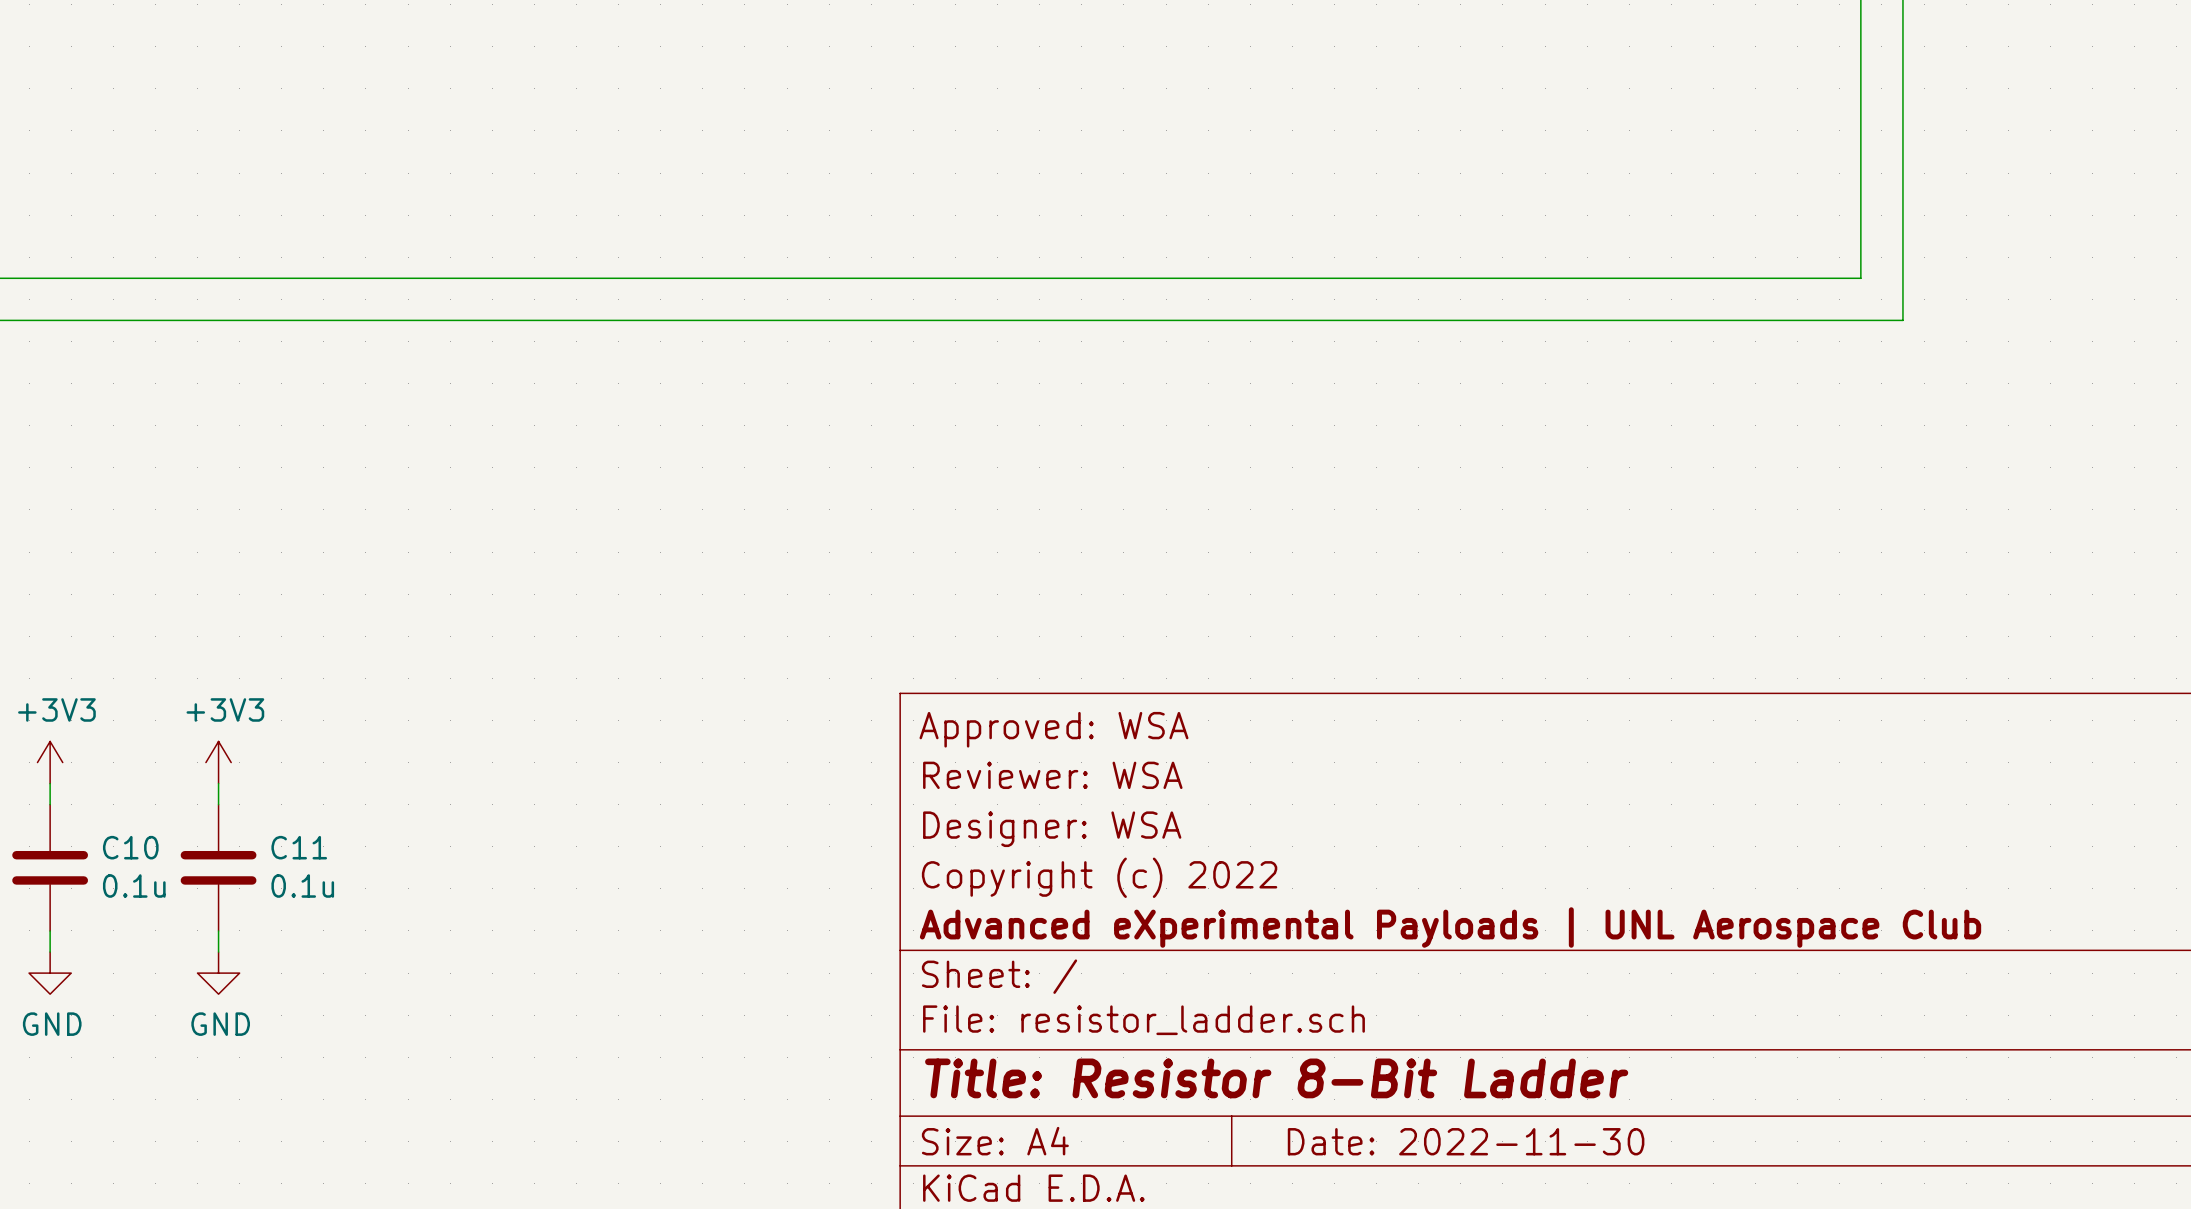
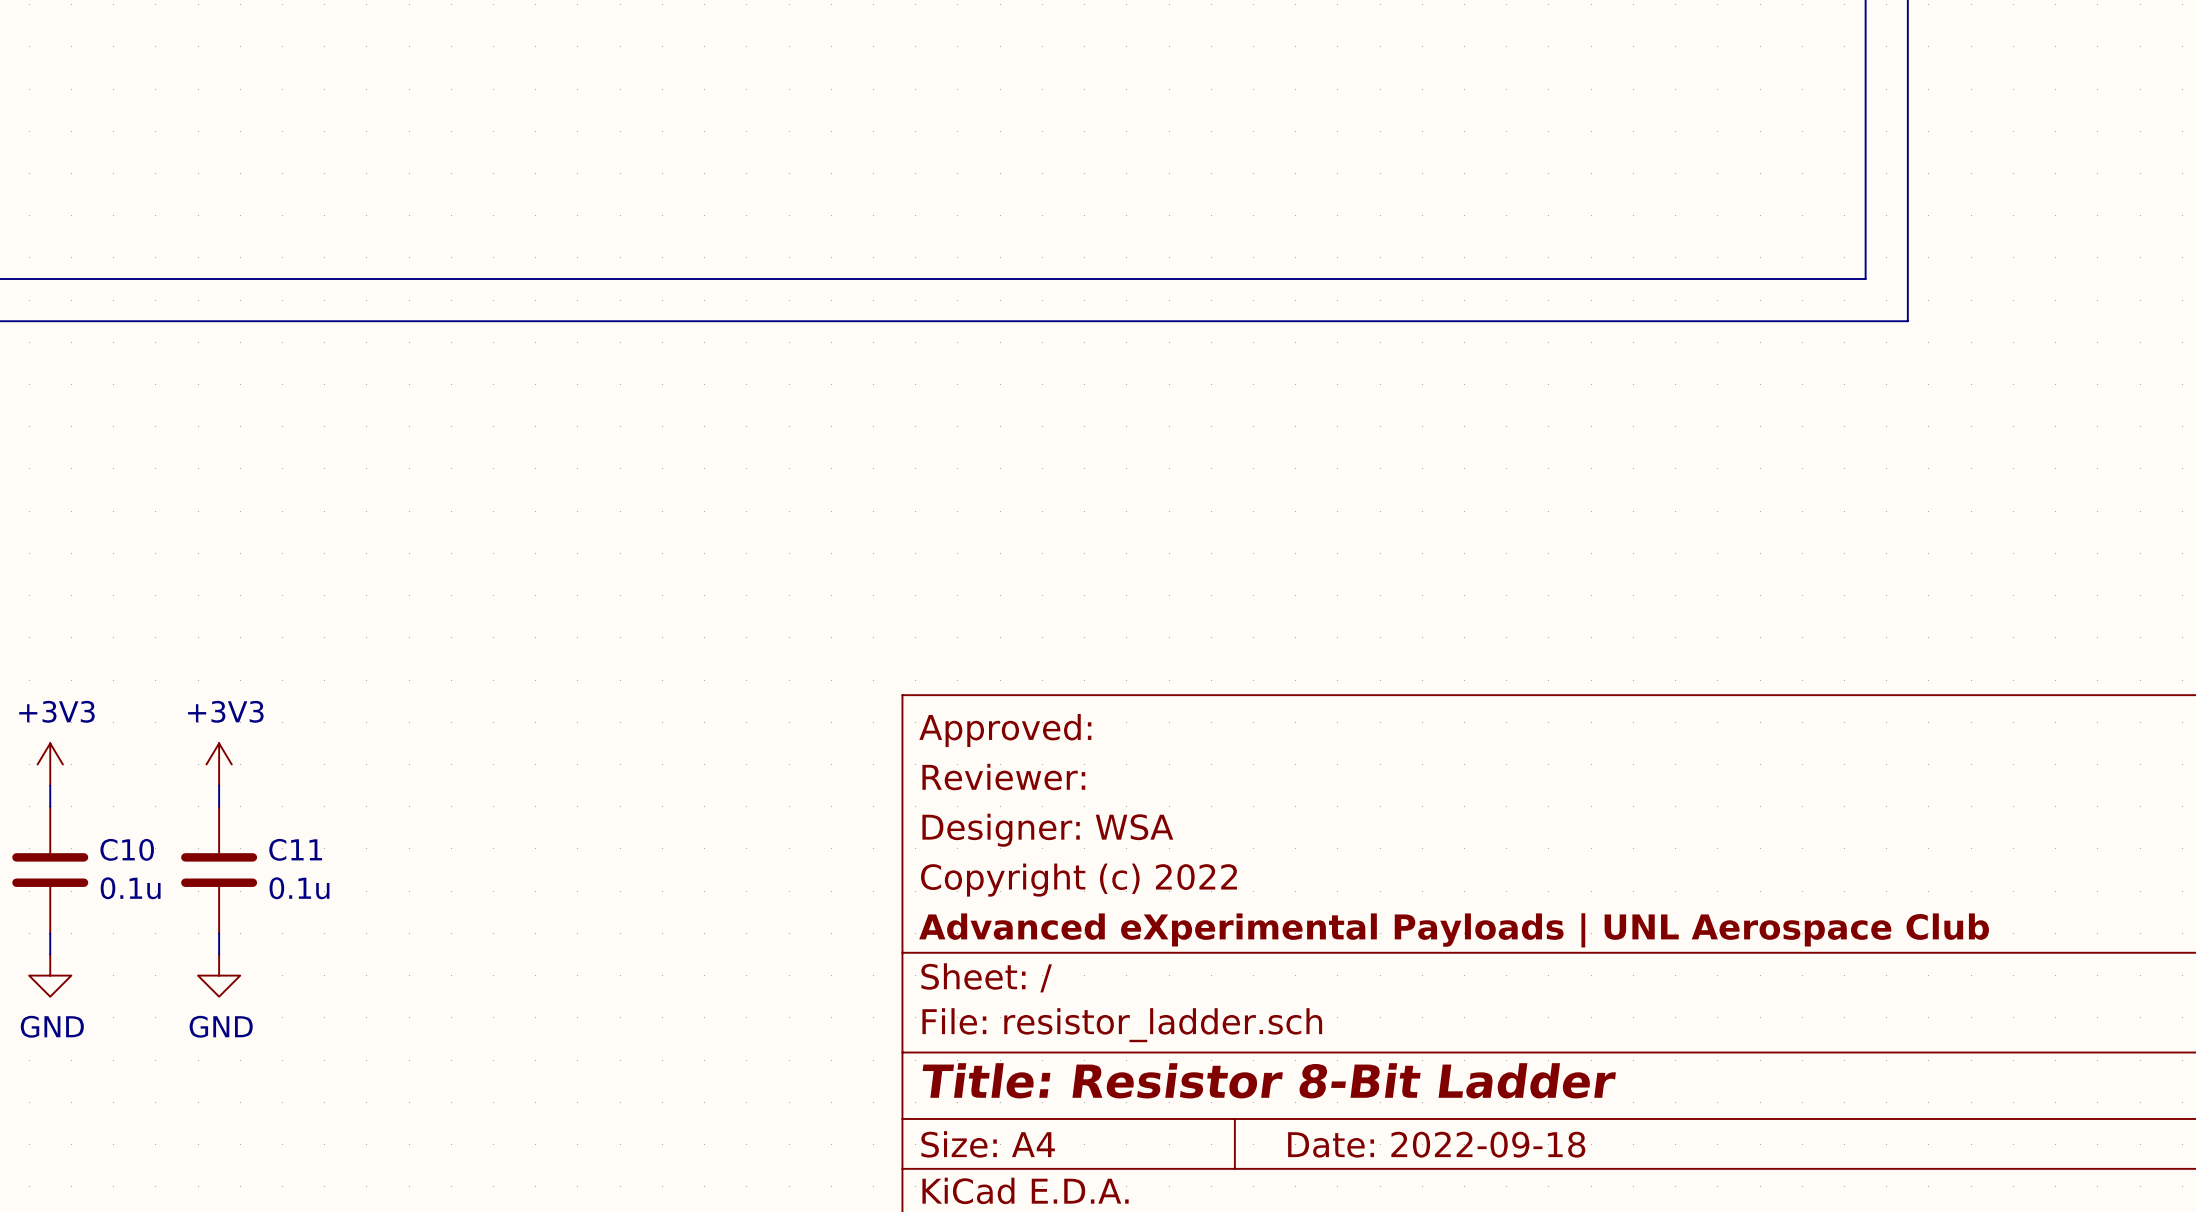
title block: Approved: WSA (1053, 729) -> Approved: (1005, 730)
title block: Reviewer: WSA (1052, 775) -> Reviewer: (1003, 777)
title block: Date: 2022-11-30 (1466, 1141) -> Date: 2022-09-18 (1436, 1144)

